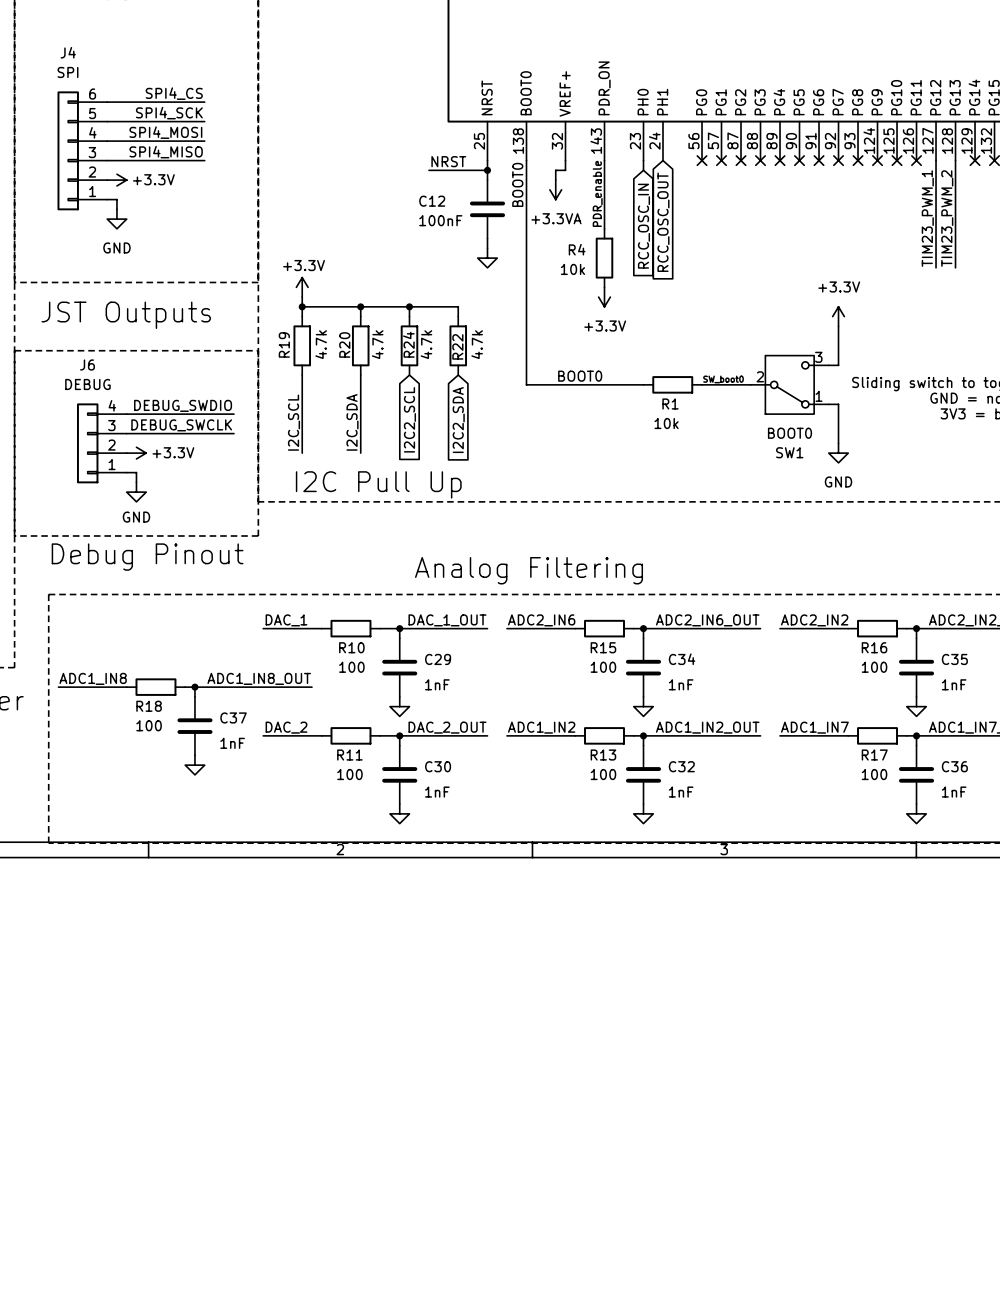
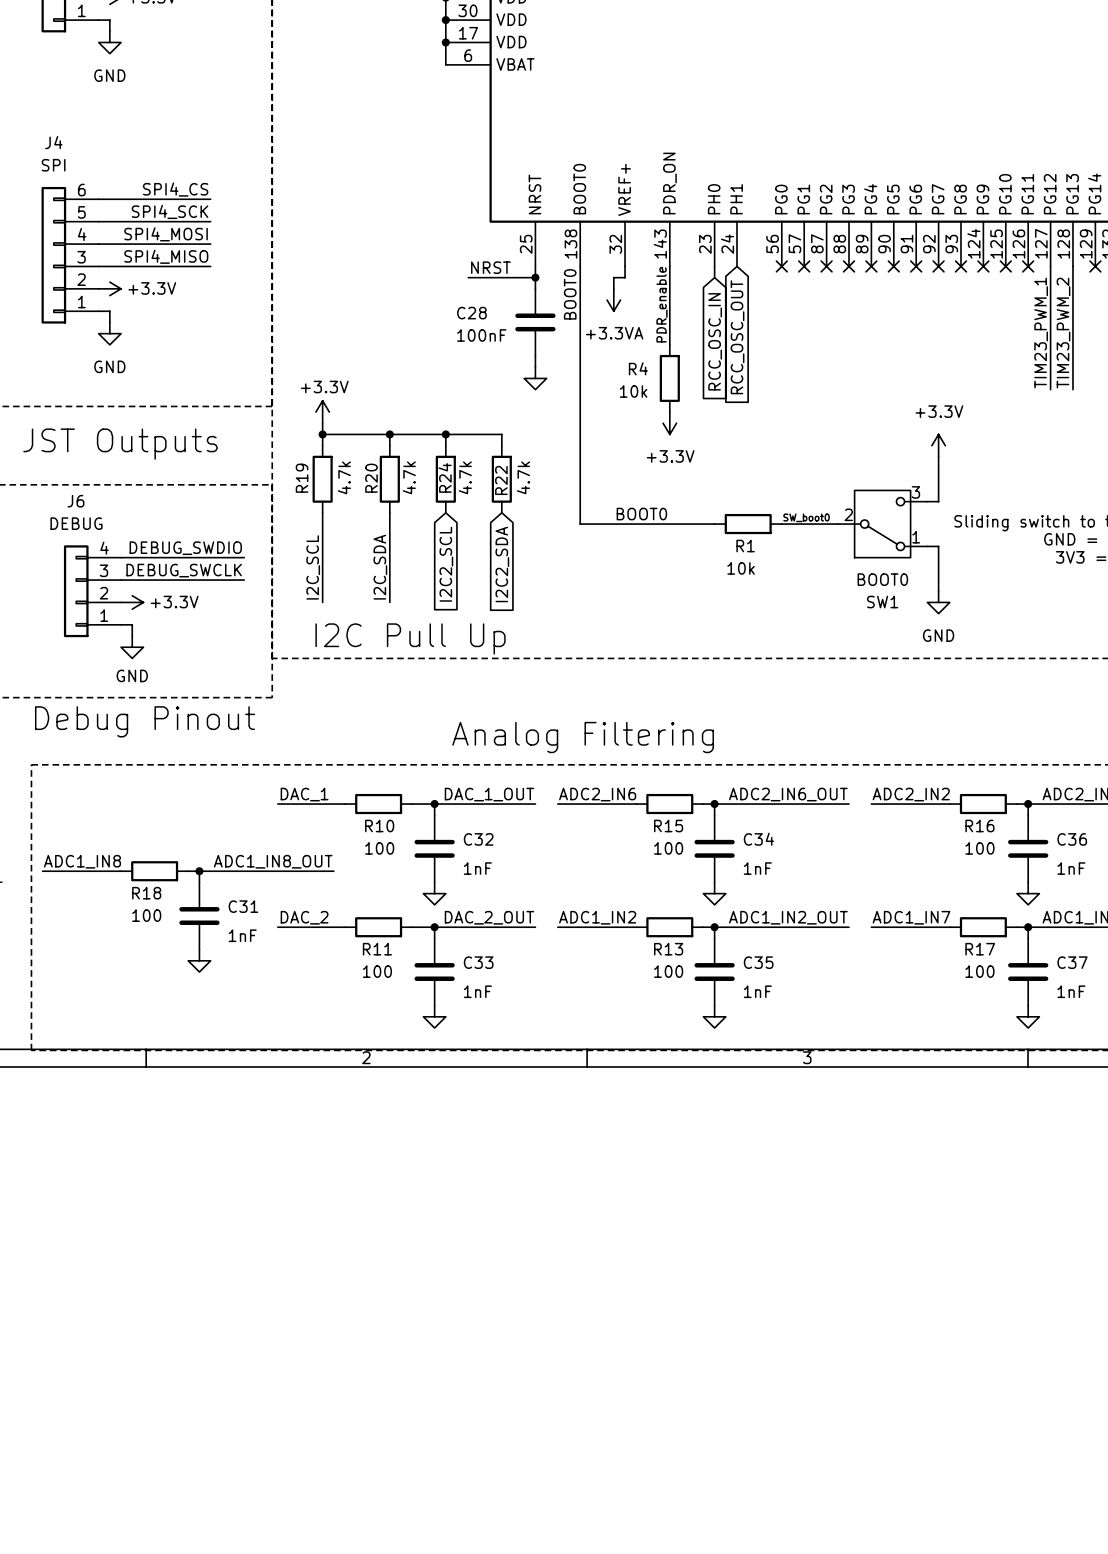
C12 name: C12 (432, 201) -> C28 (471, 313)
C29 name: C29 (438, 659) -> C32 (478, 839)
C35 name: C35 (954, 659) -> C36 (1072, 839)
C37 name: C37 (233, 717) -> C31 (243, 906)
C30 name: C30 (438, 766) -> C33 (478, 962)
C32 name: C32 (681, 766) -> C35 (758, 962)
C36 name: C36 (954, 766) -> C37 (1072, 962)

